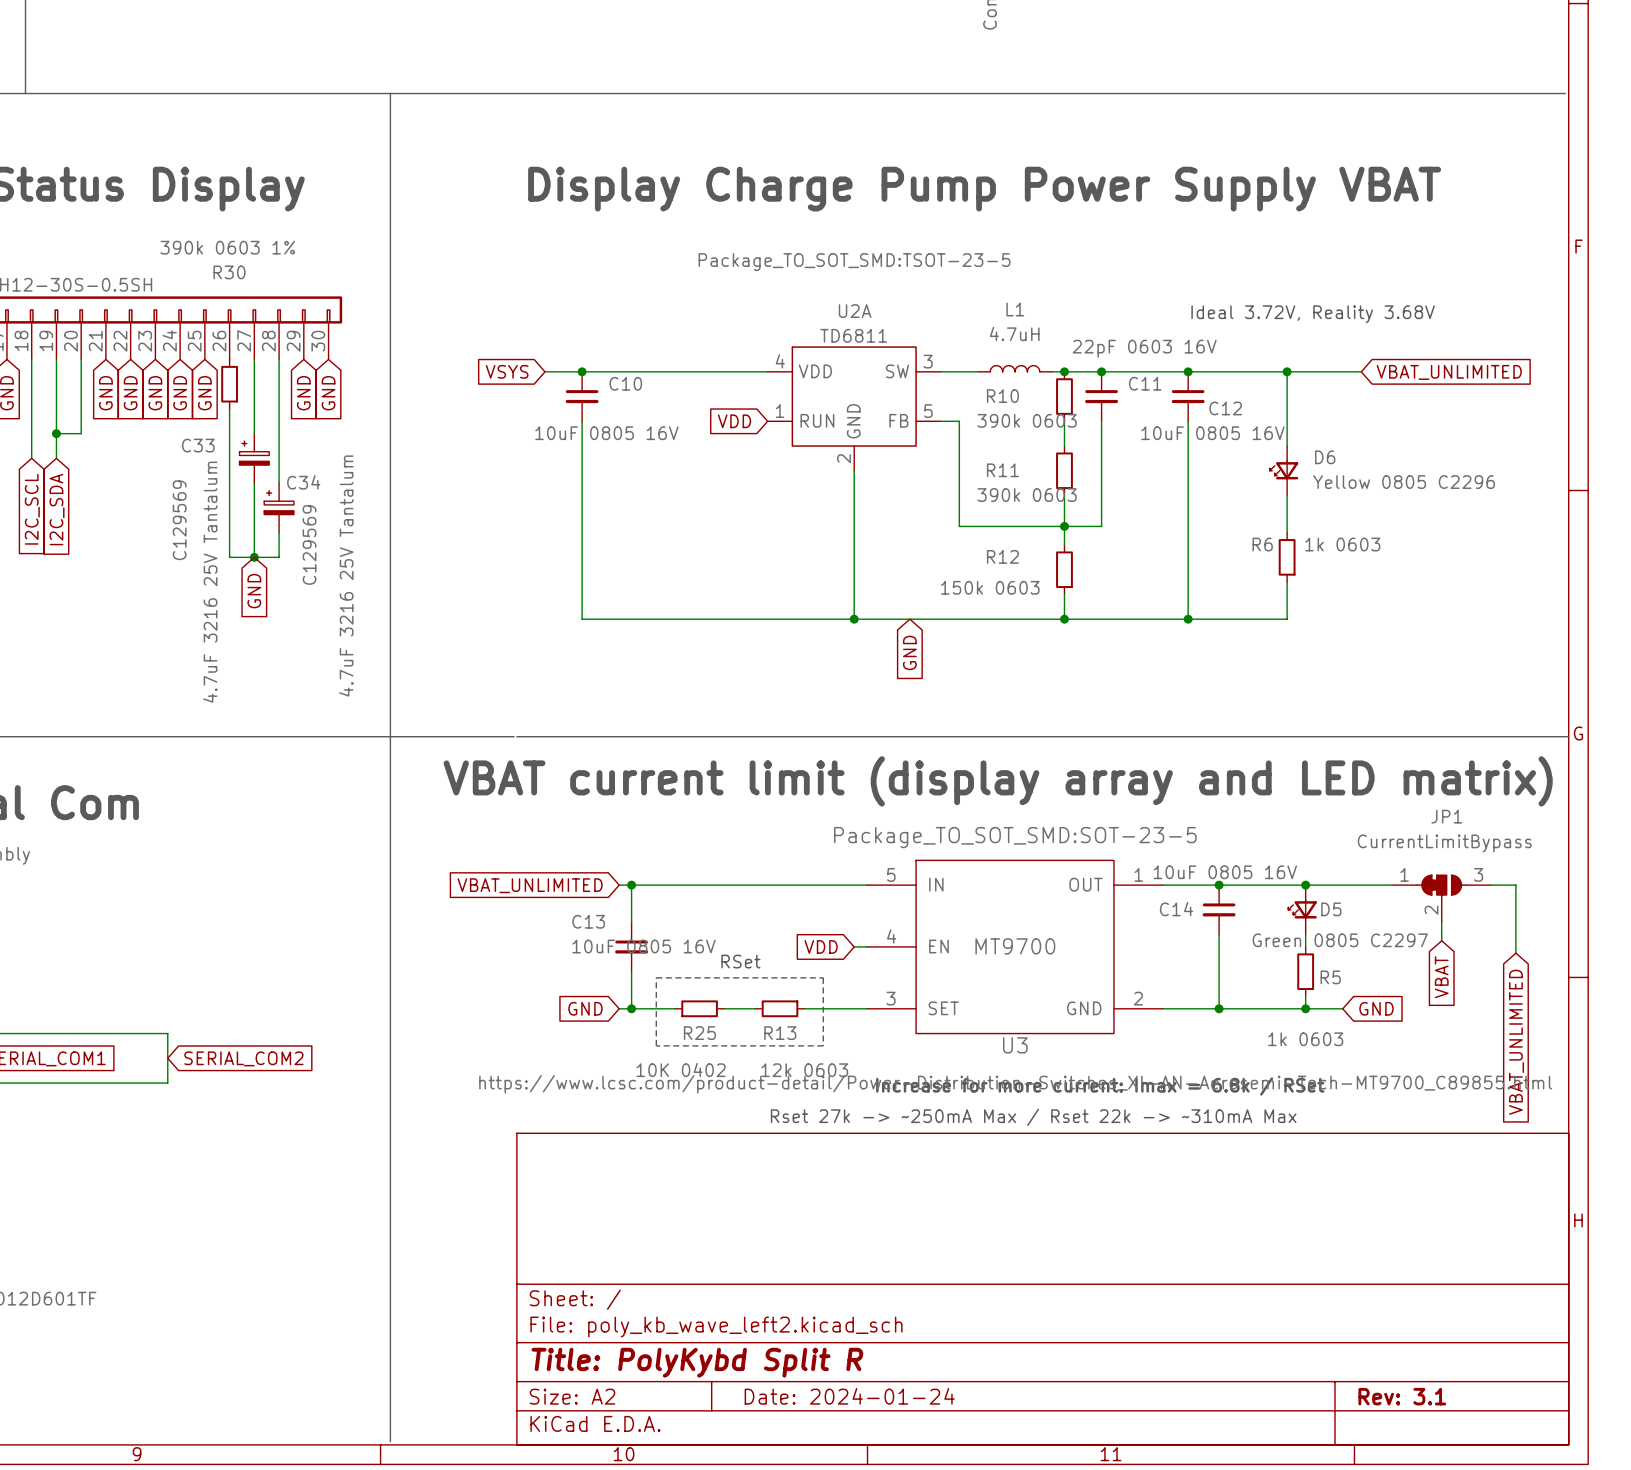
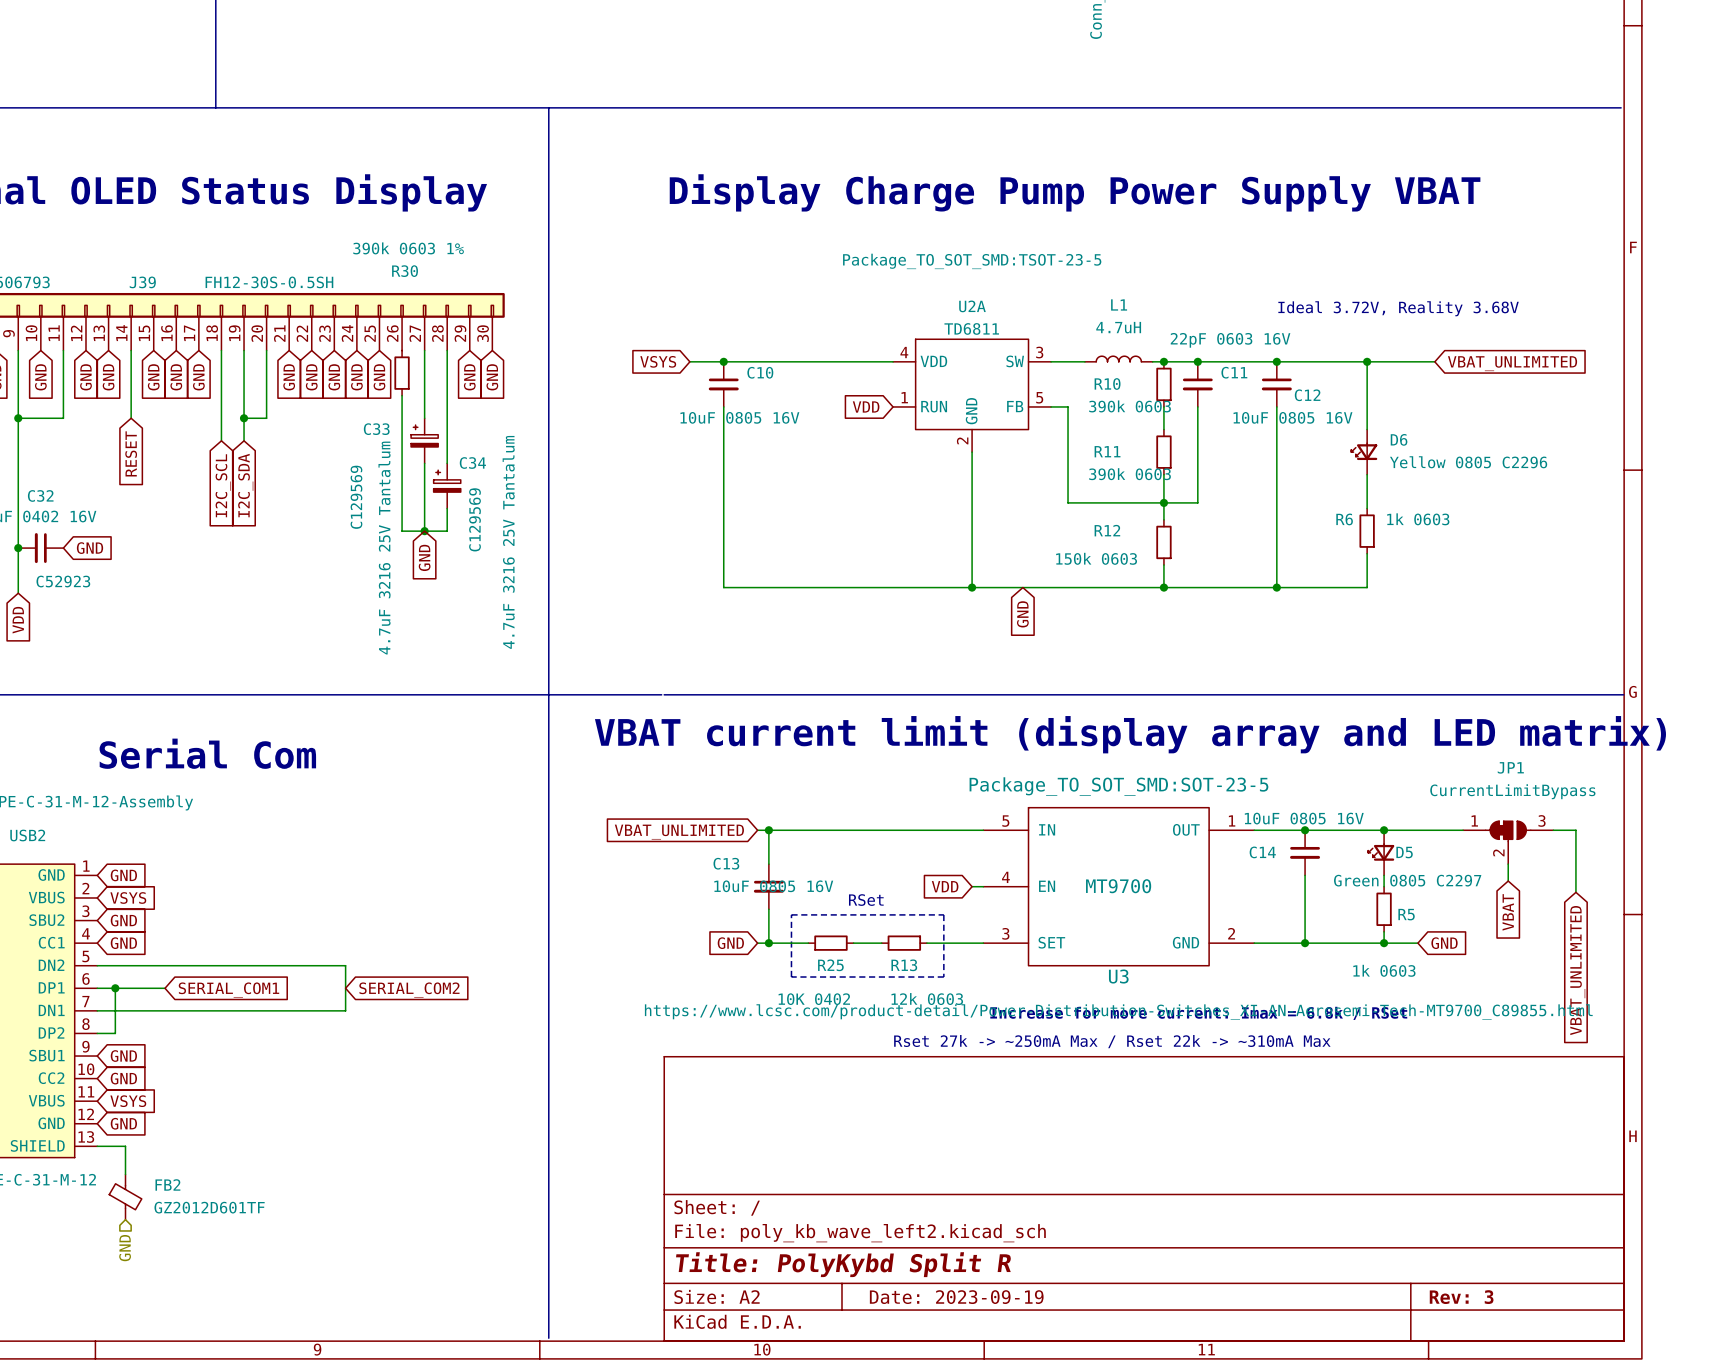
title block: Date: 2024-01-24 (849, 1396) -> Date: 2023-09-19 (956, 1297)
title block: Rev: 3.1 (1402, 1396) -> Rev: 3 (1461, 1297)

